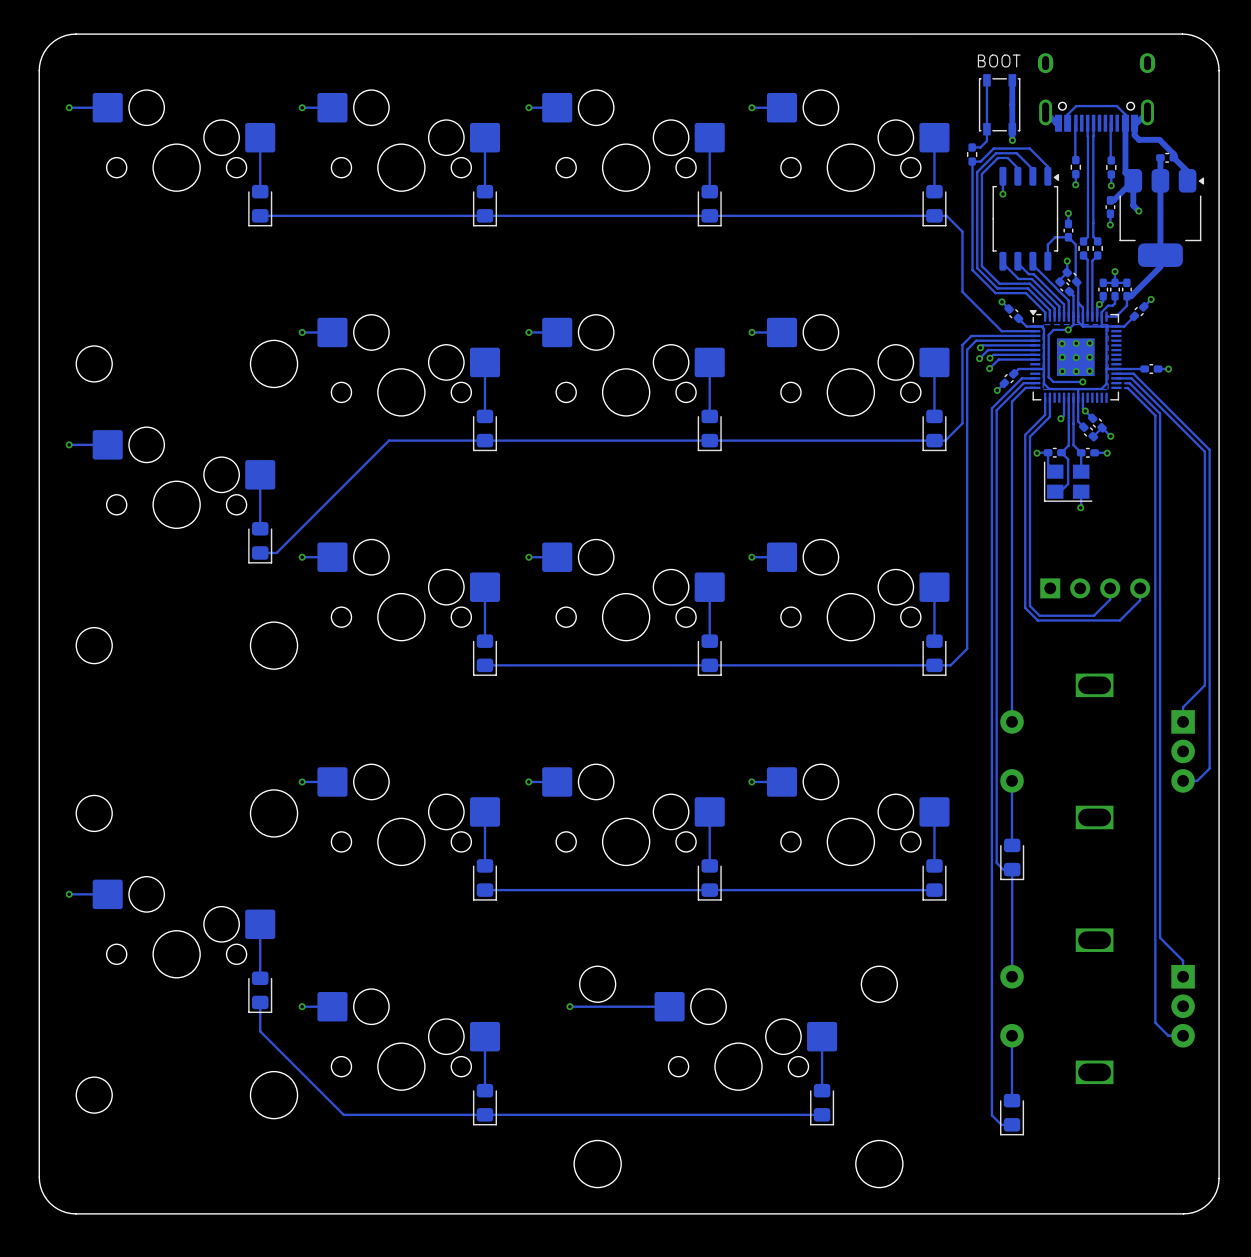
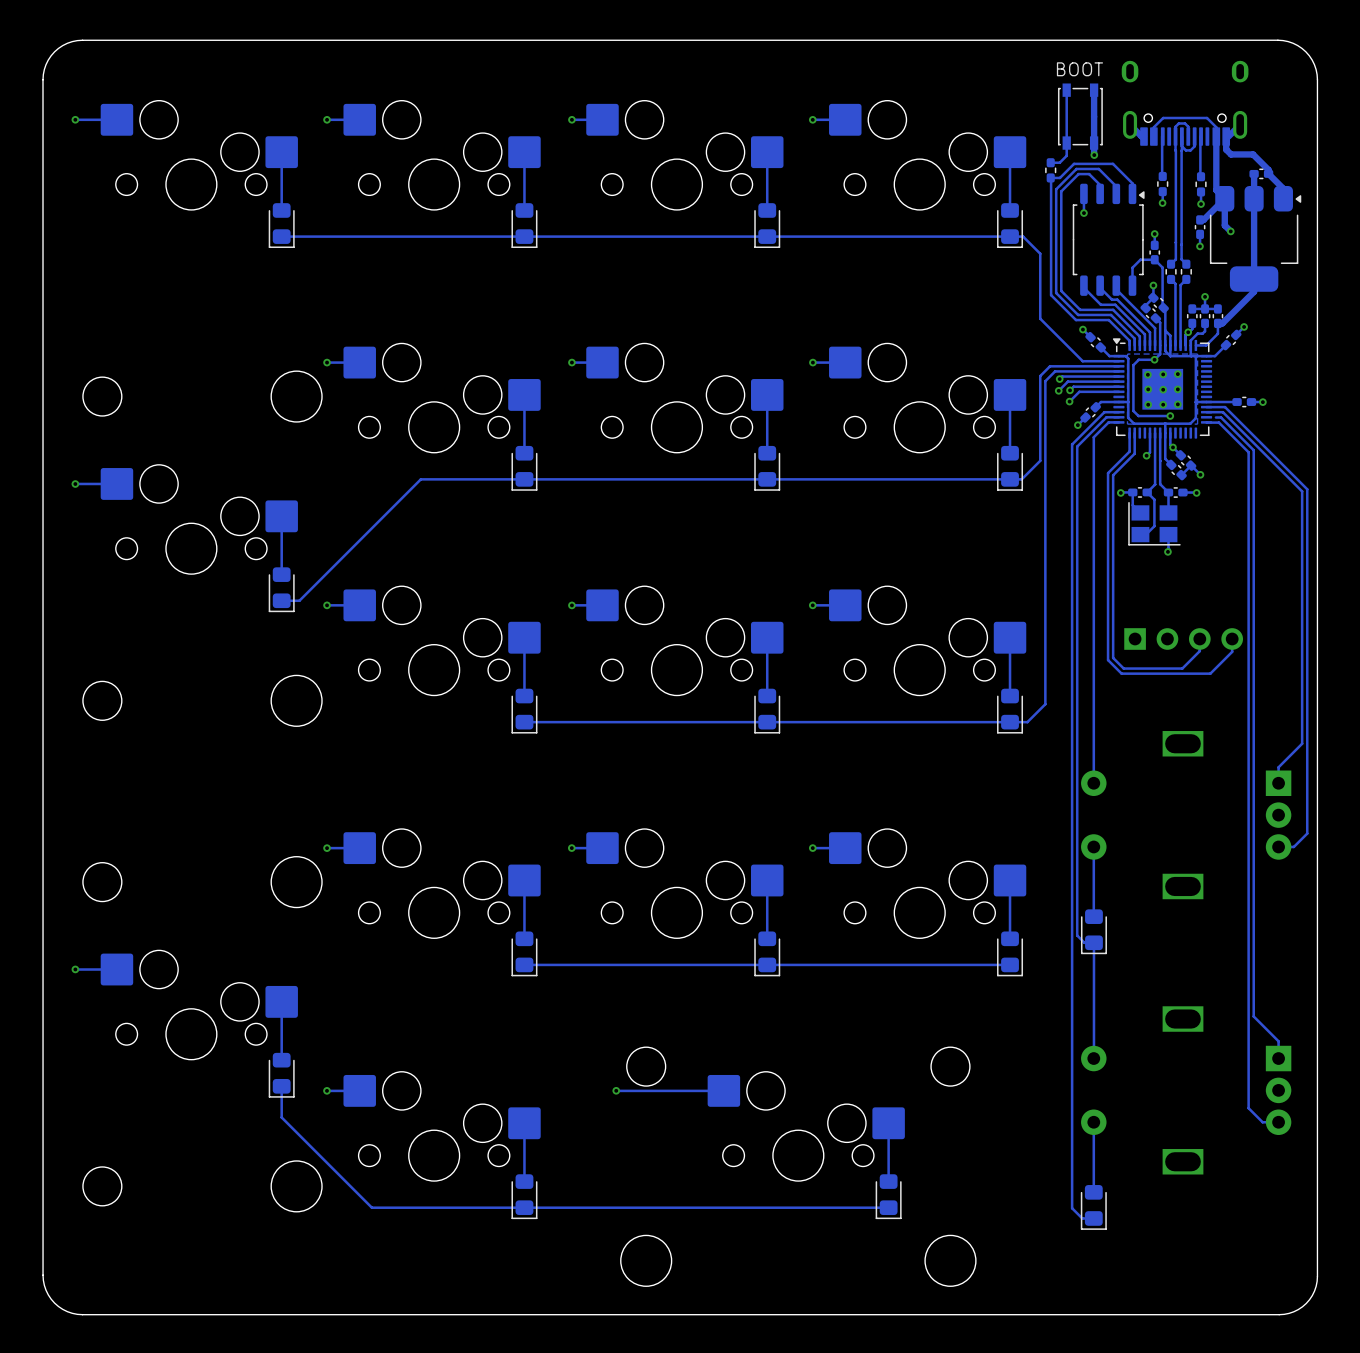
track: none -> (1188, 136) (1188, 126) (1184, 123) (1178, 123) (1175, 126) (1175, 136)
track: none -> (1194, 136) (1194, 146) (1190, 150) (1186, 150) (1181, 146)
track: none -> (1206, 422) (1215, 422)

